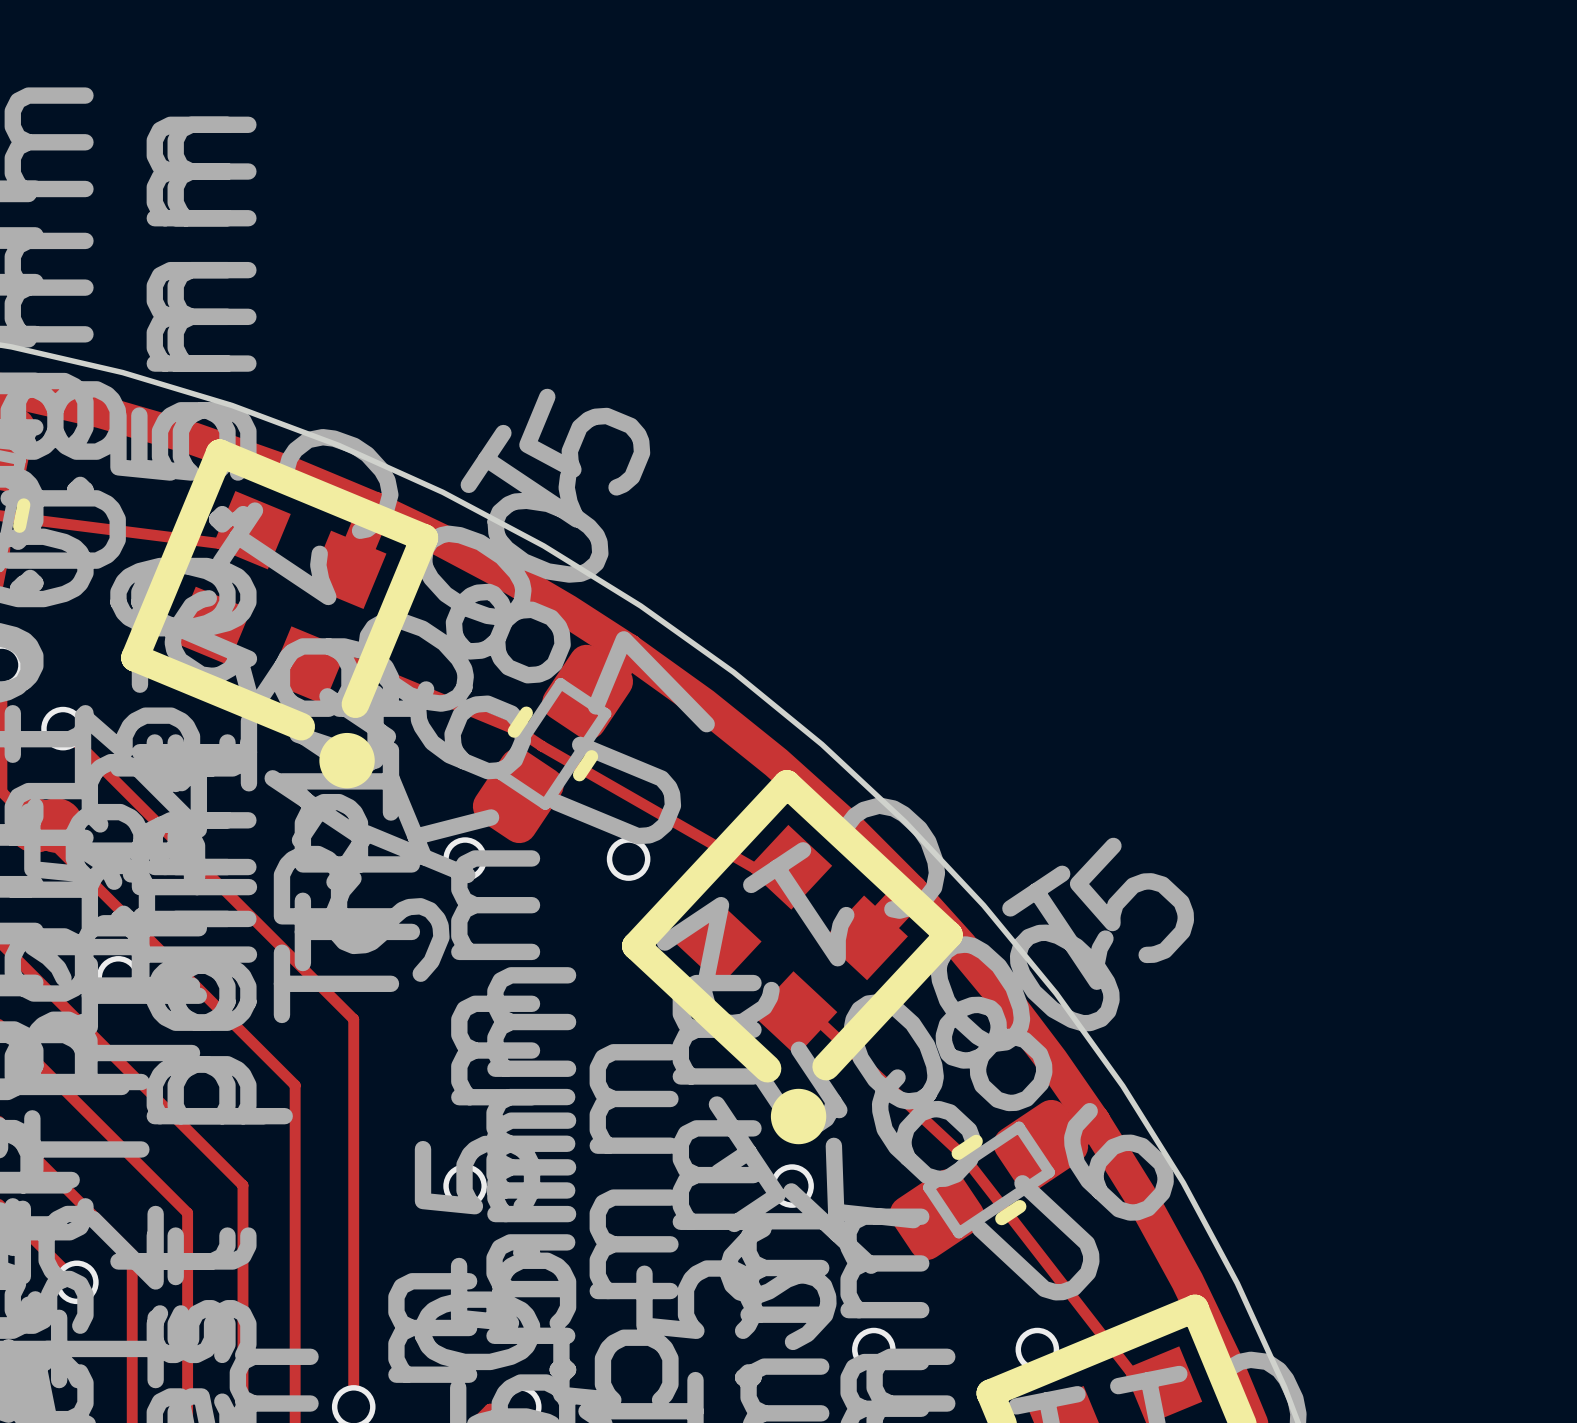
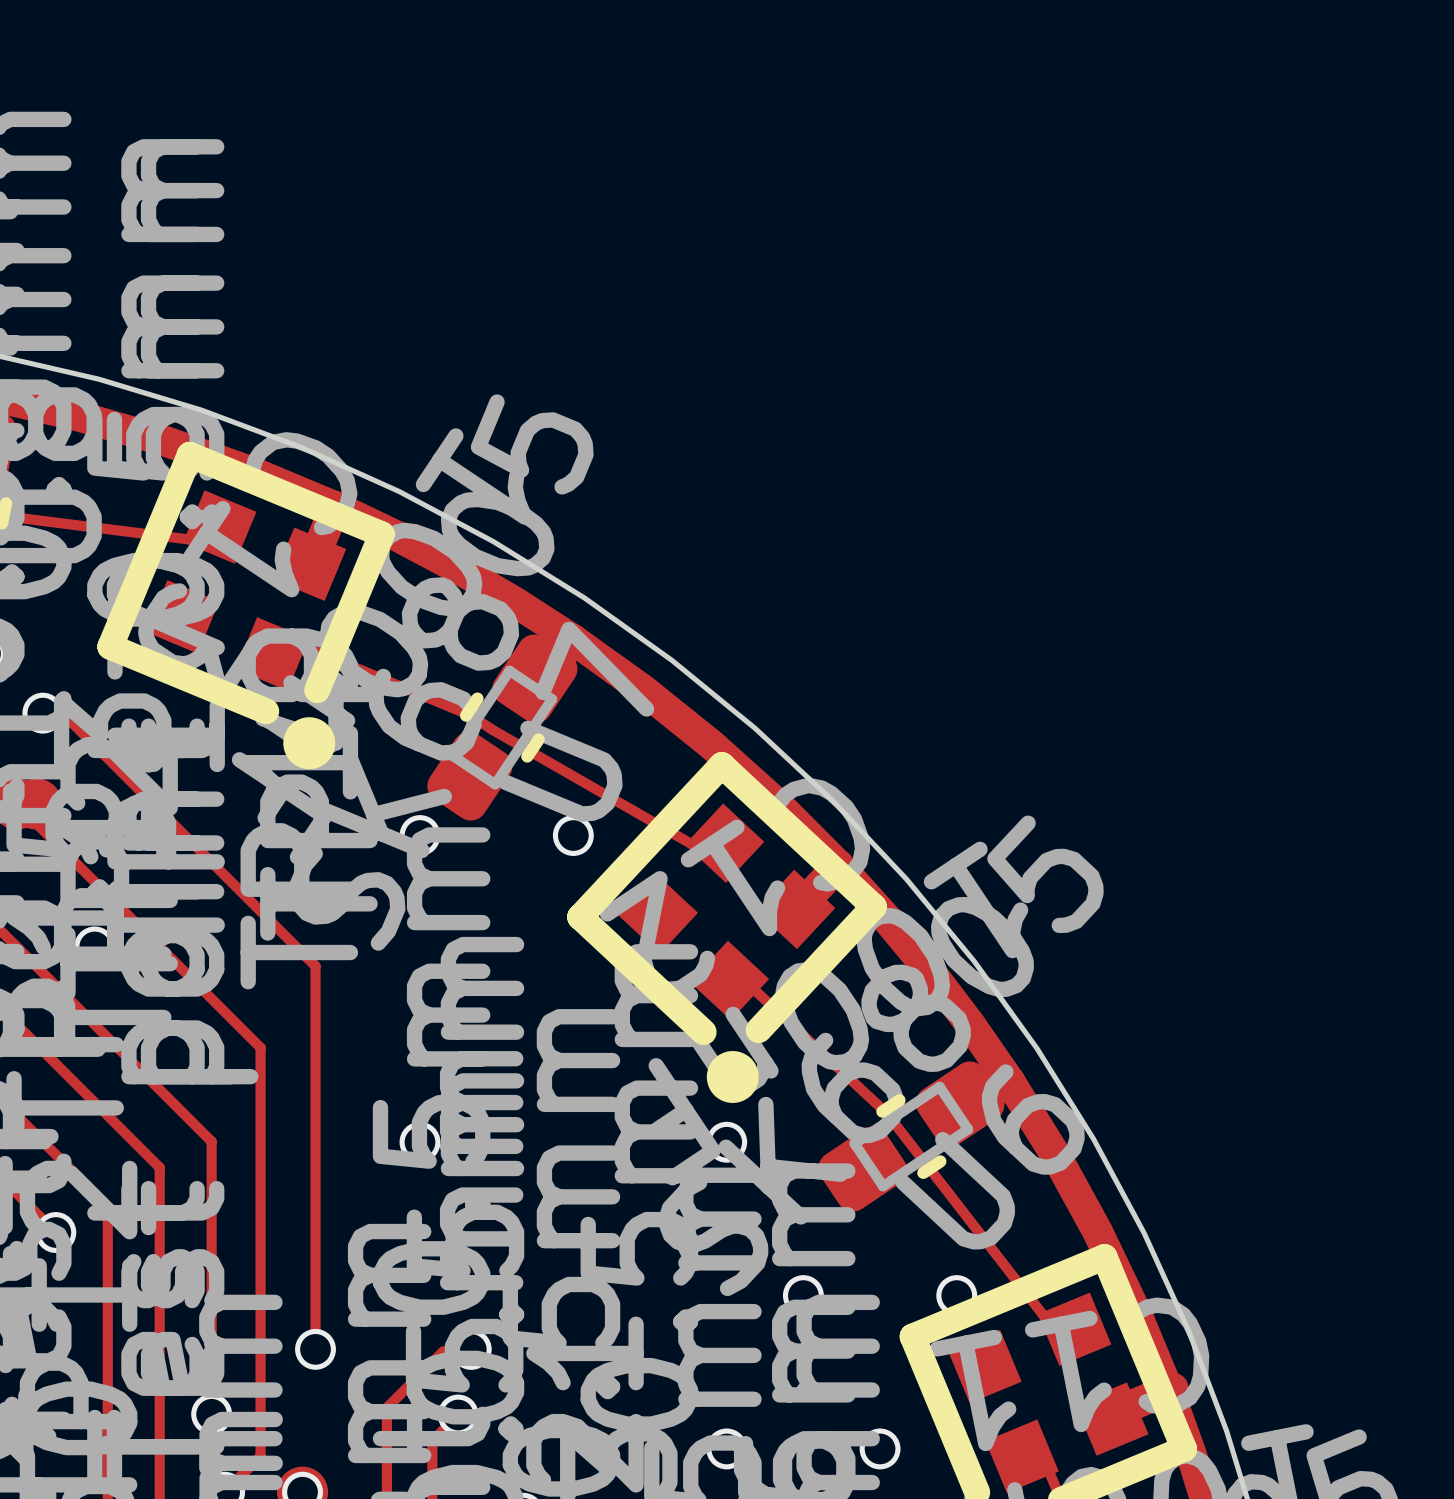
track: (63, 728) (353, 1019) -> (42, 713) (62, 713) (315, 966) (315, 985)

